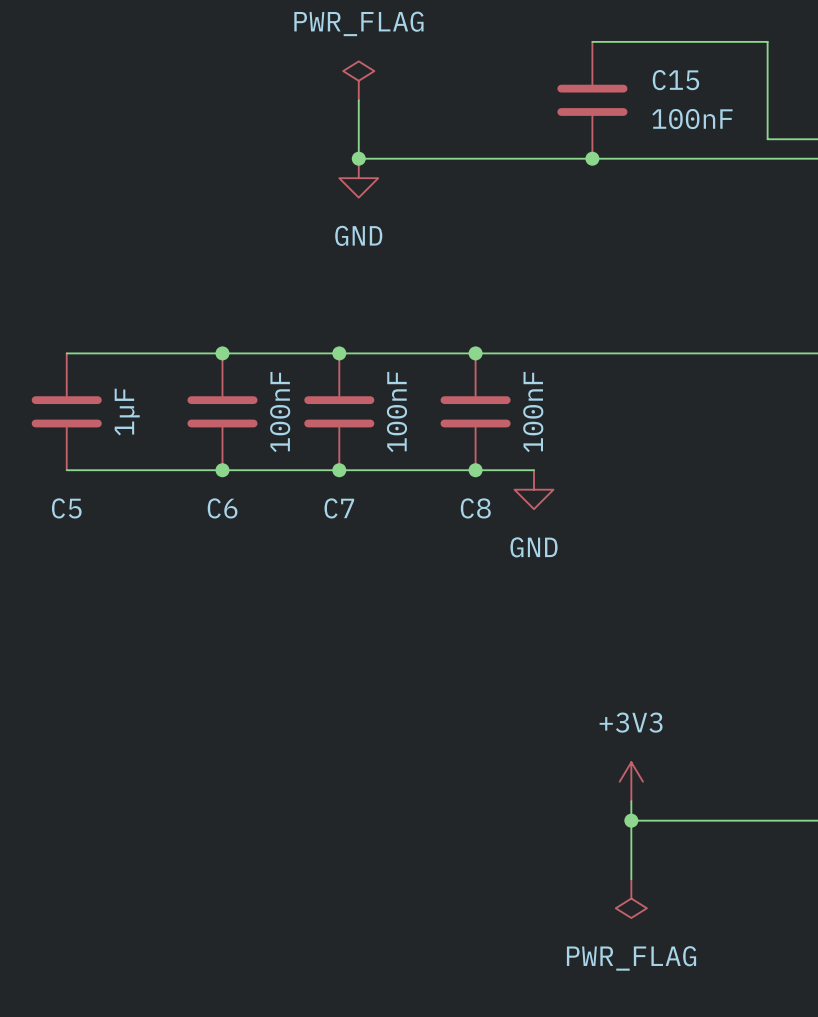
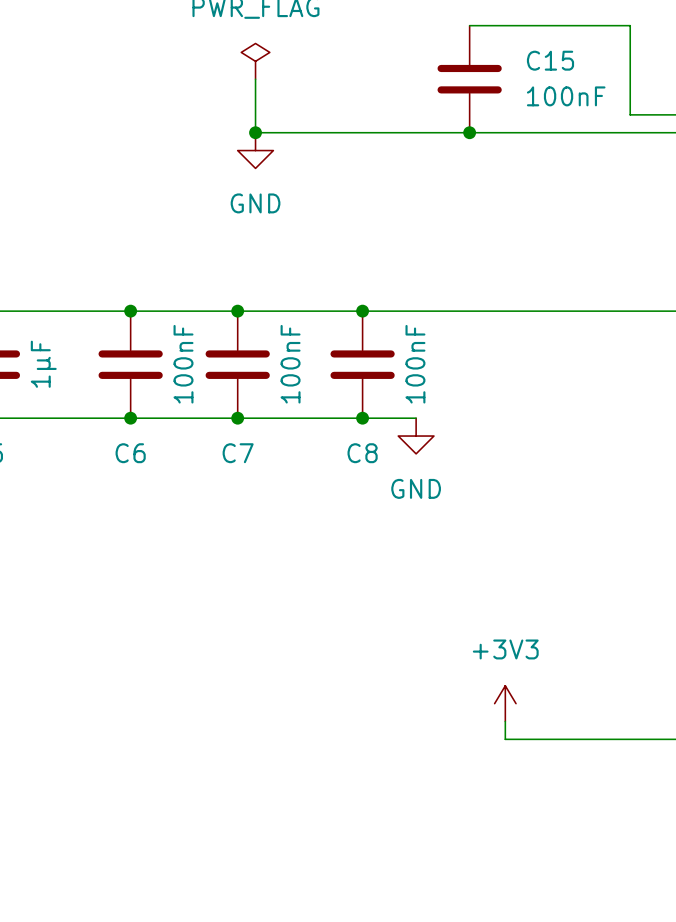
wire: (631, 820) (631, 879) -> none
junction: (631, 820) -> none
power symbol: PWR_FLAG (631, 898) -> none

